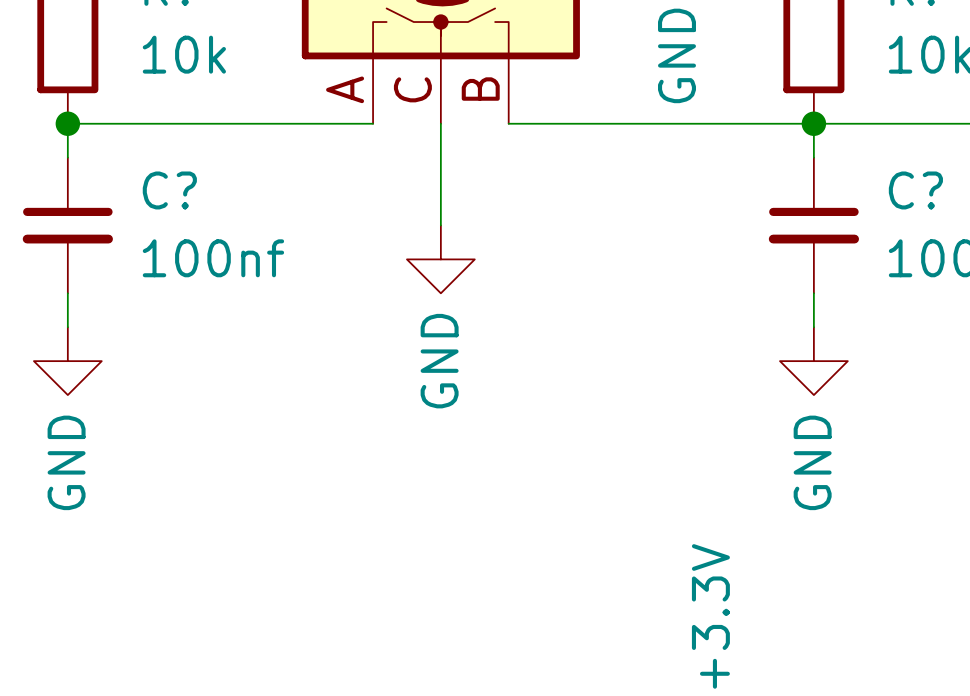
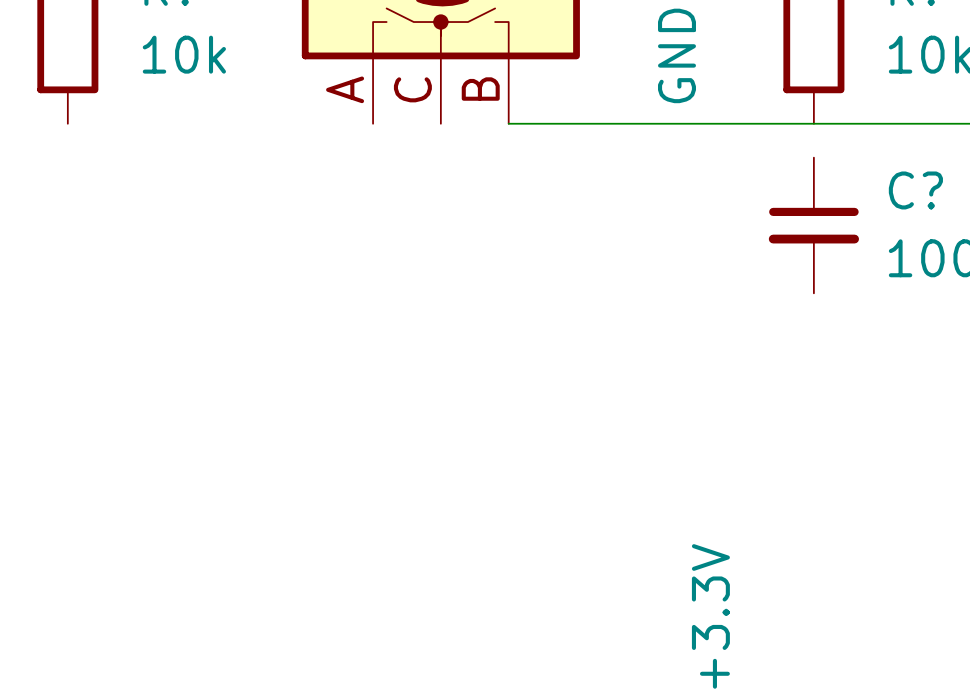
junction: (67, 123) -> none
wire: (373, 123) (67, 123) (67, 157) -> none
wire: (440, 123) (440, 225) -> none
wire: (813, 123) (813, 157) -> none
junction: (813, 123) -> none
C?: 100nf (67, 225) -> none
power symbol: GND (440, 259) -> none
wire: (67, 293) (67, 327) -> none
wire: (813, 293) (813, 327) -> none
power symbol: GND (67, 361) -> none
power symbol: GND (813, 361) -> none

